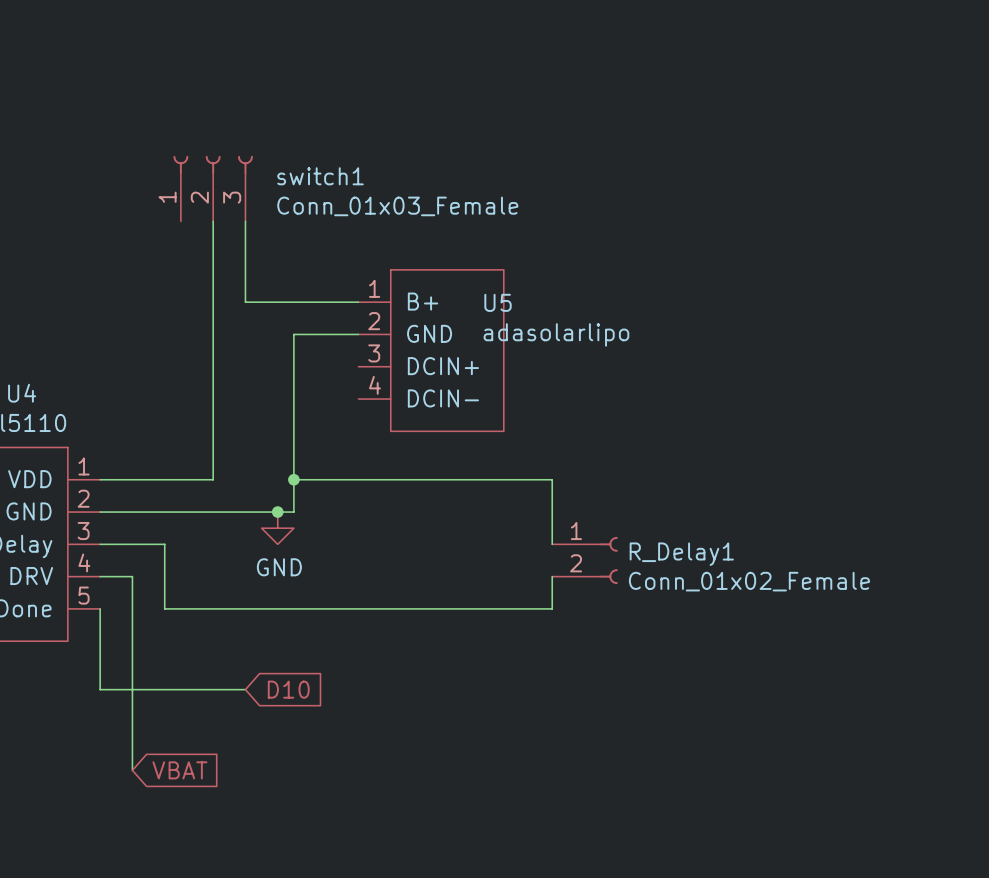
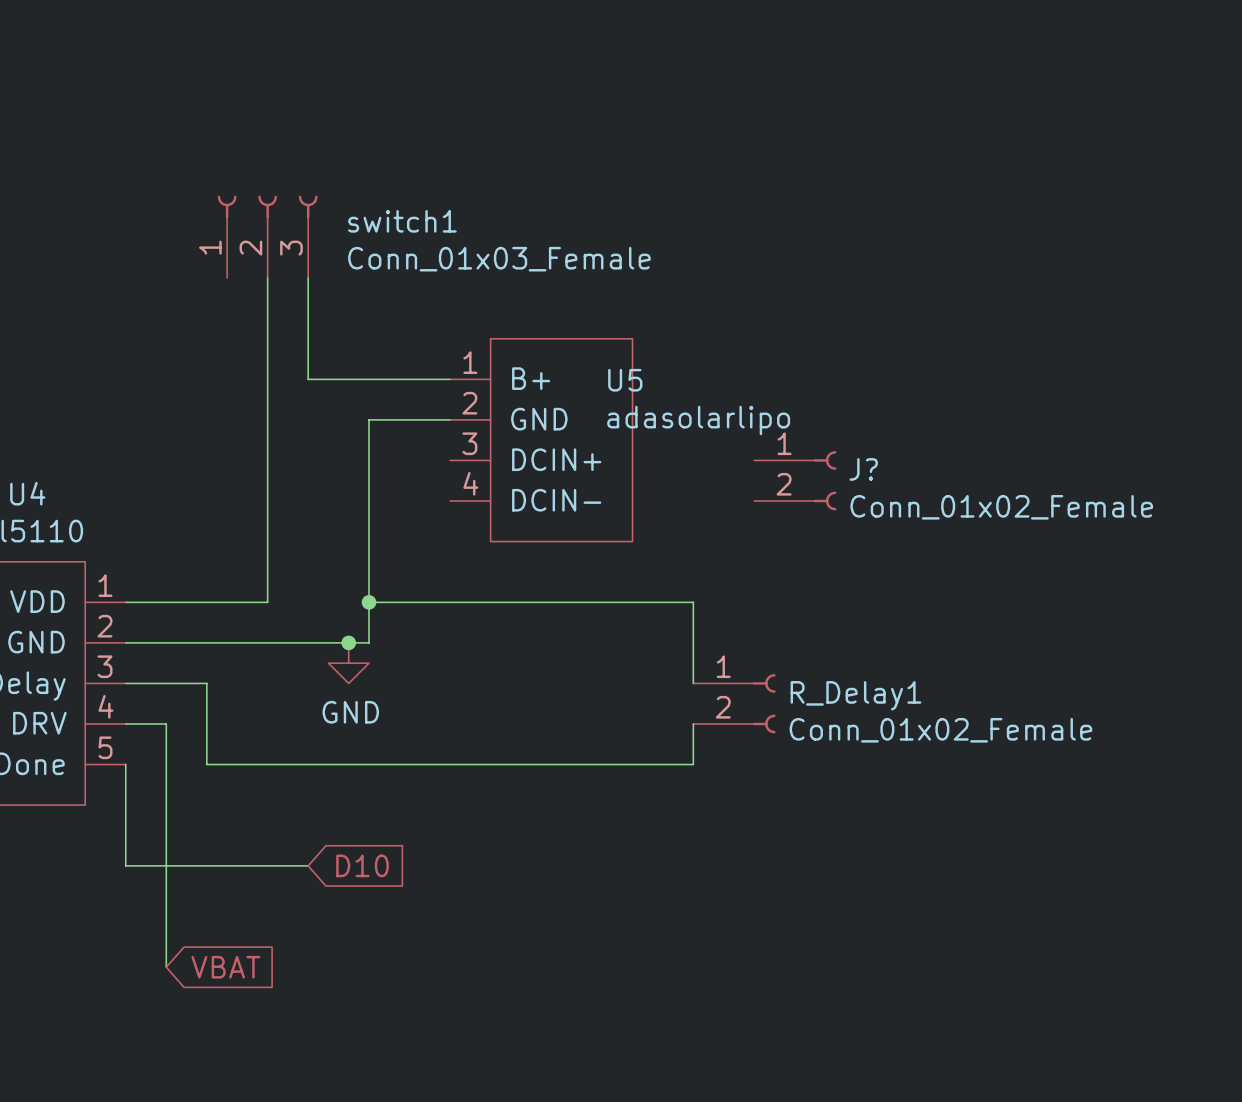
J?: none -> Conn_01x02_Female (795, 480)

